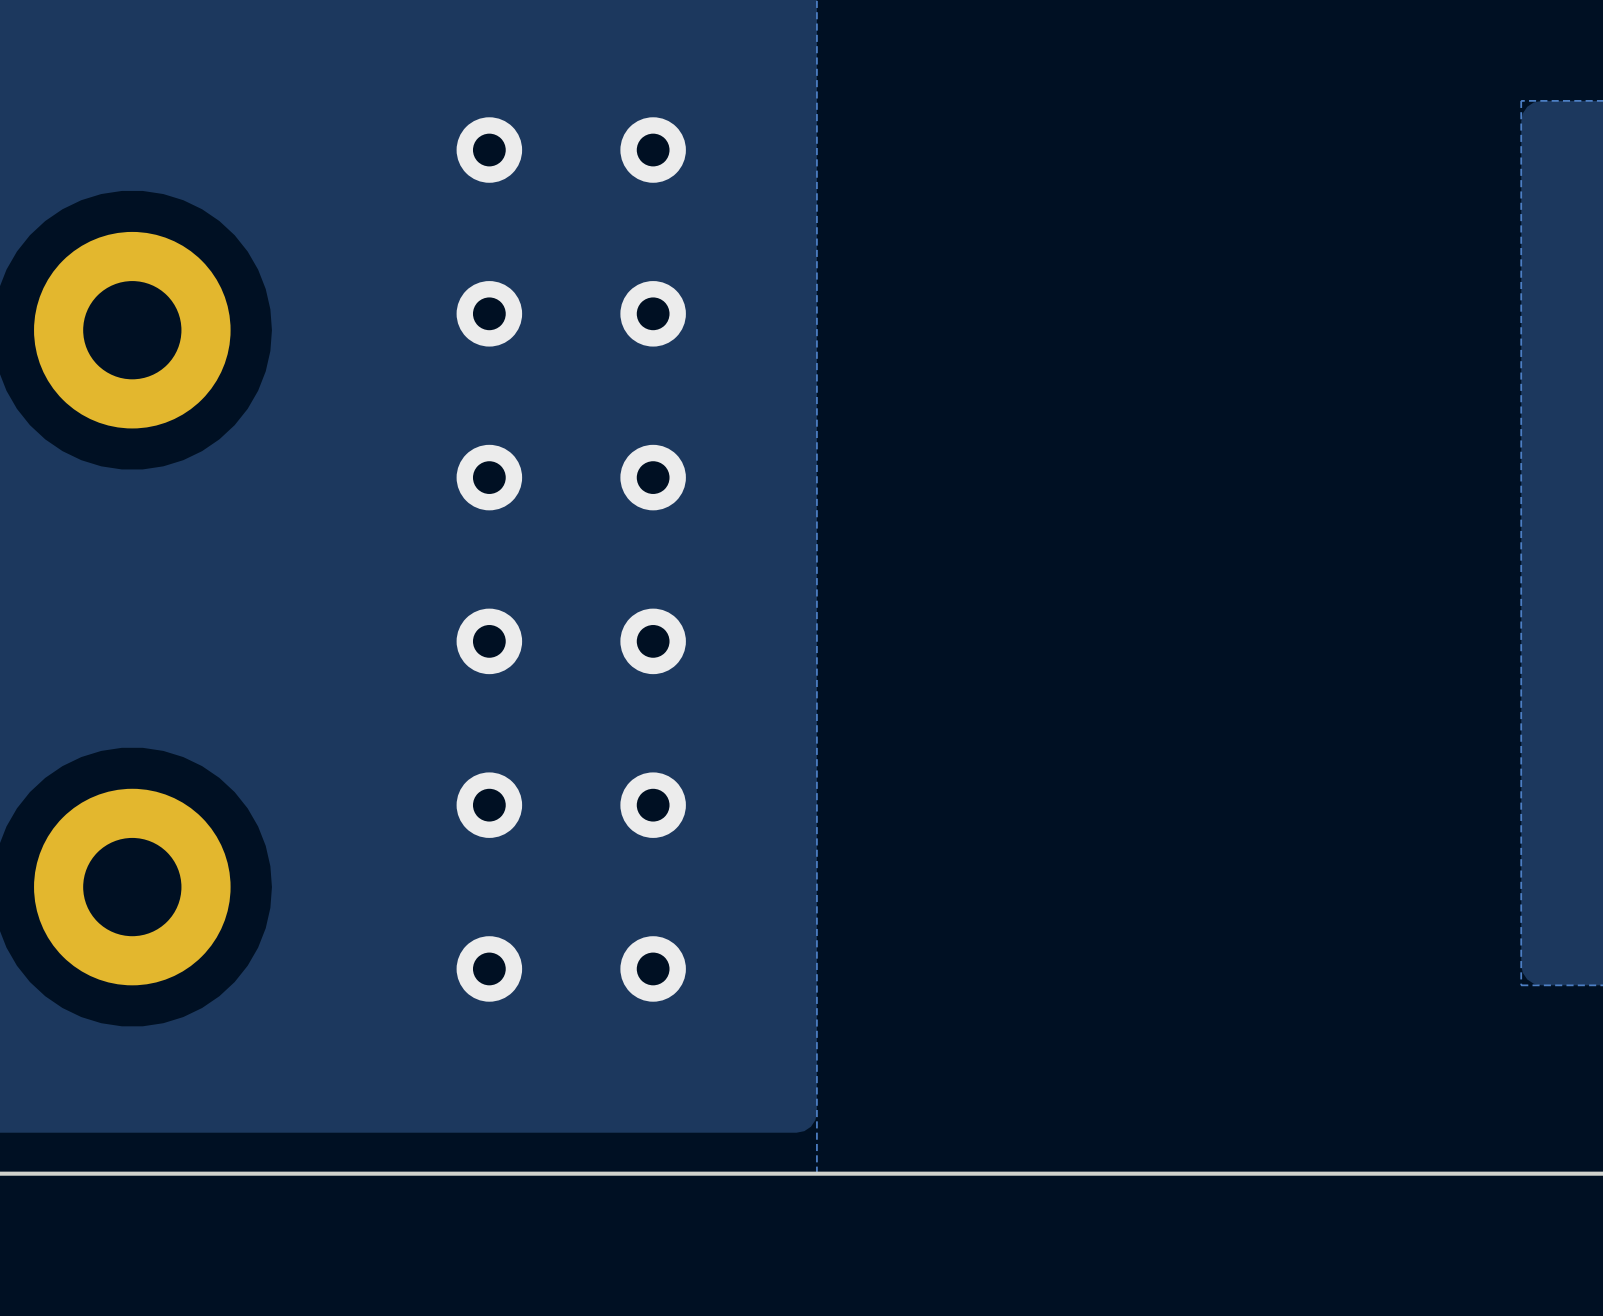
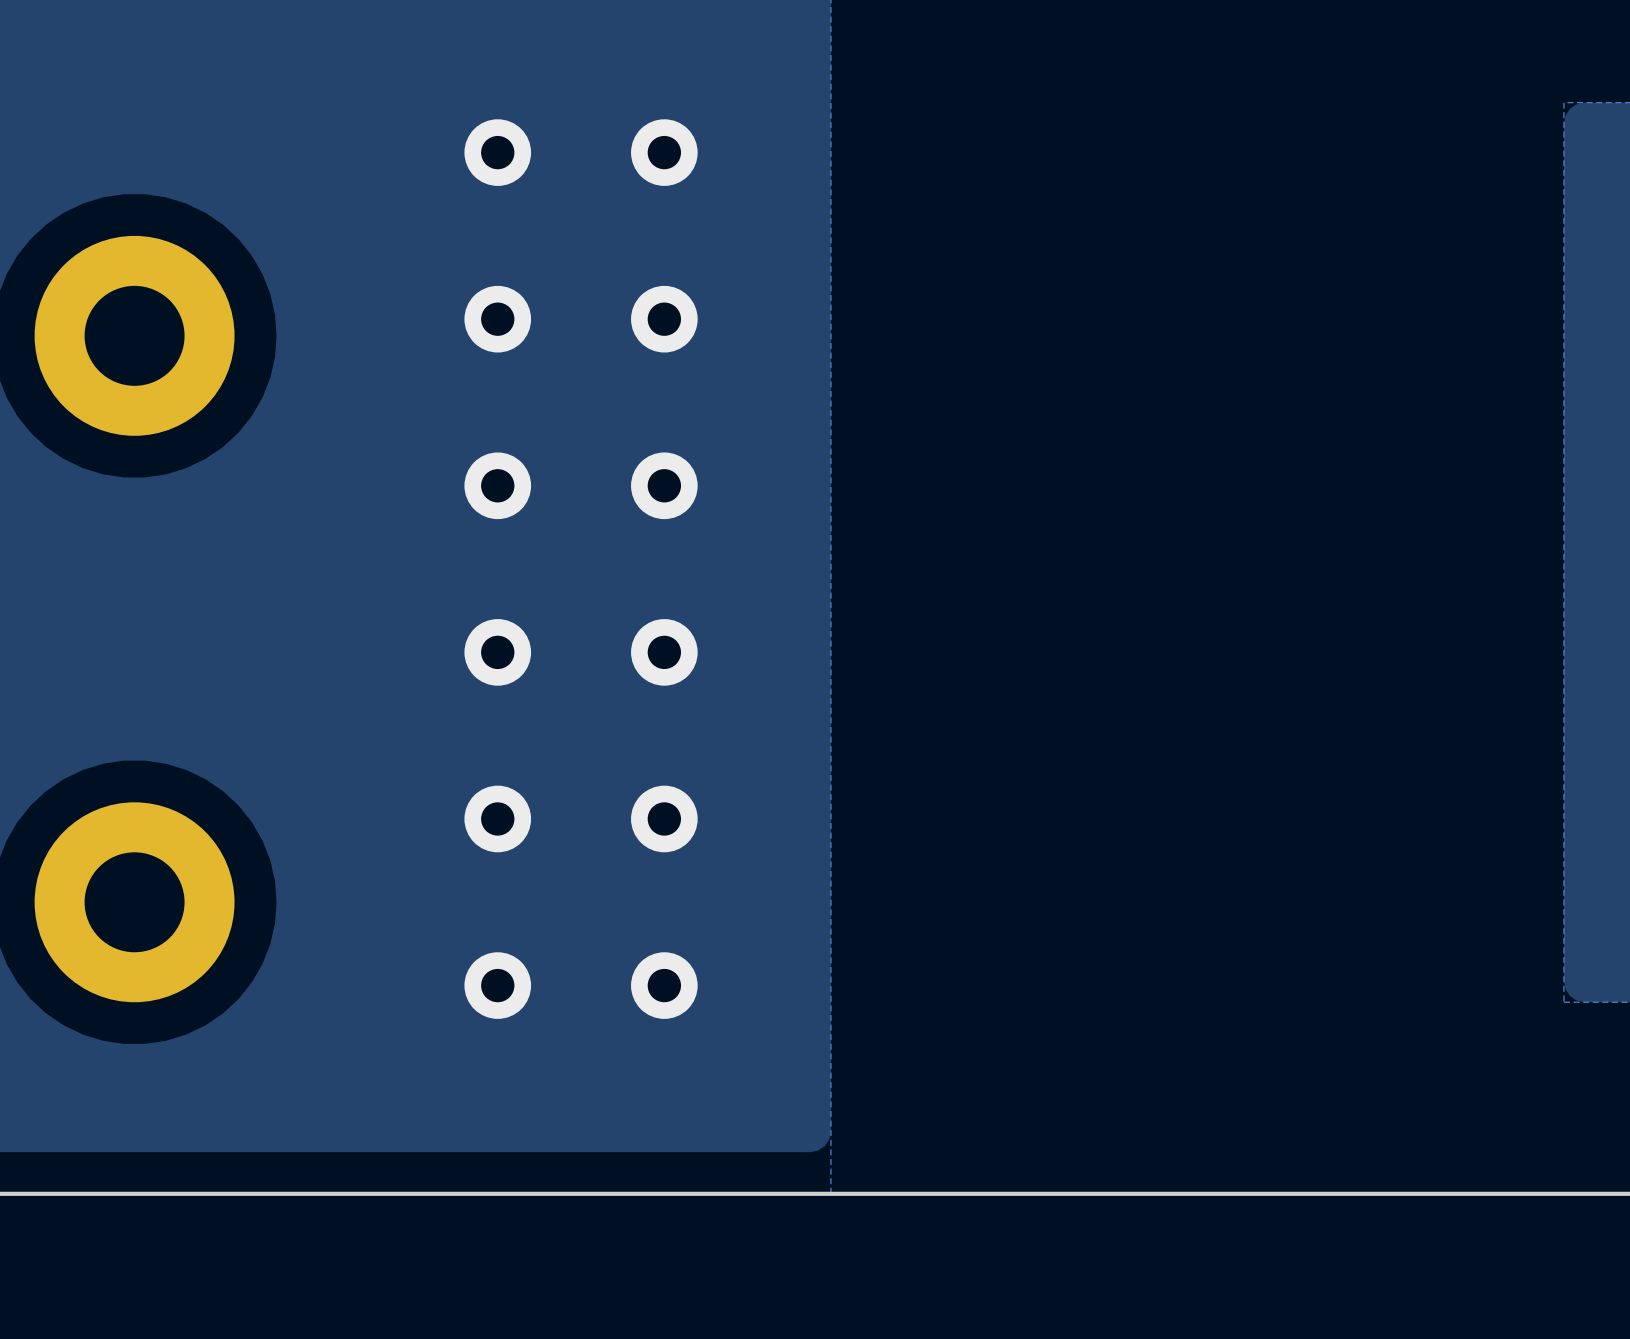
zone outline: (1537, 100) (1521, 100) (1521, 985) (1537, 985) -> (1563, 102) (1563, 1002)

